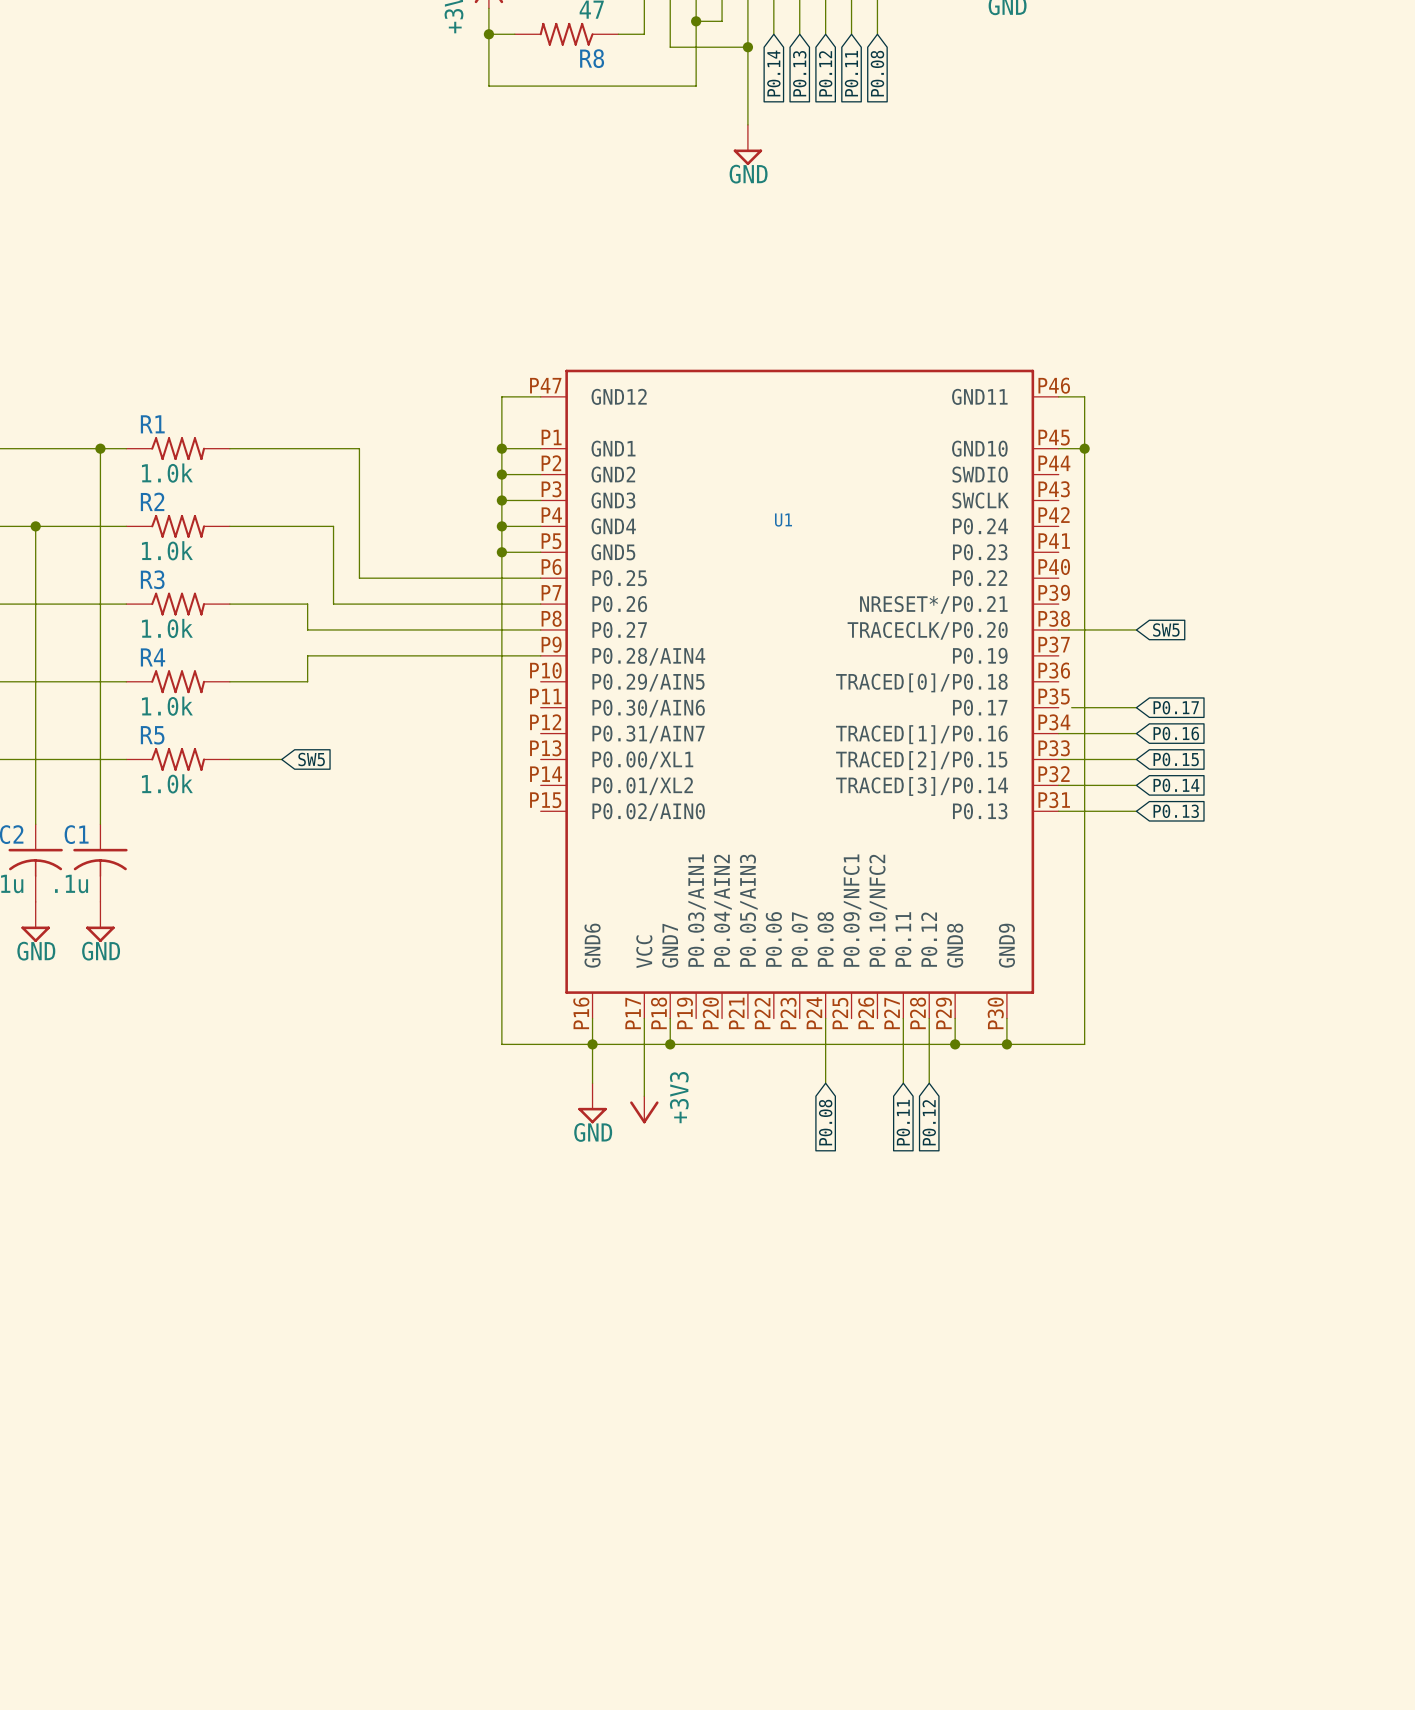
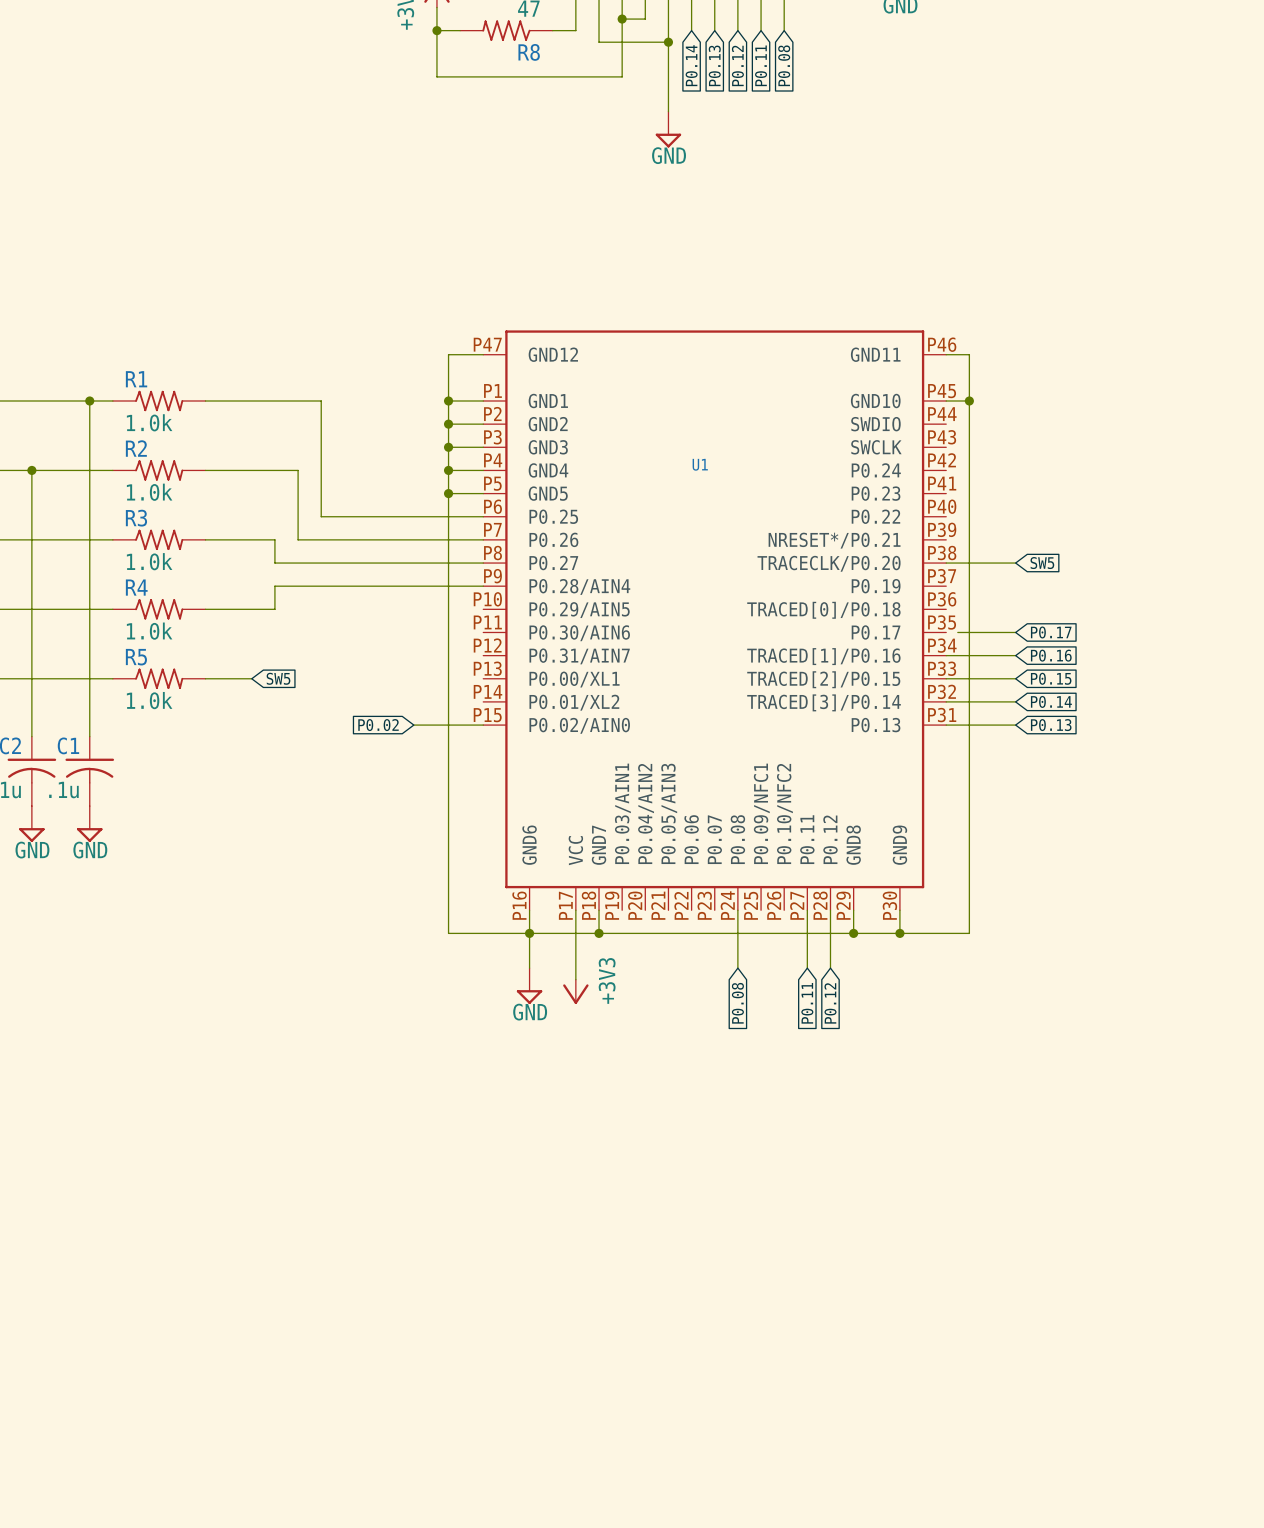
global label: none -> P0.02 (378, 725)
wire: none -> (413, 725) (483, 725)

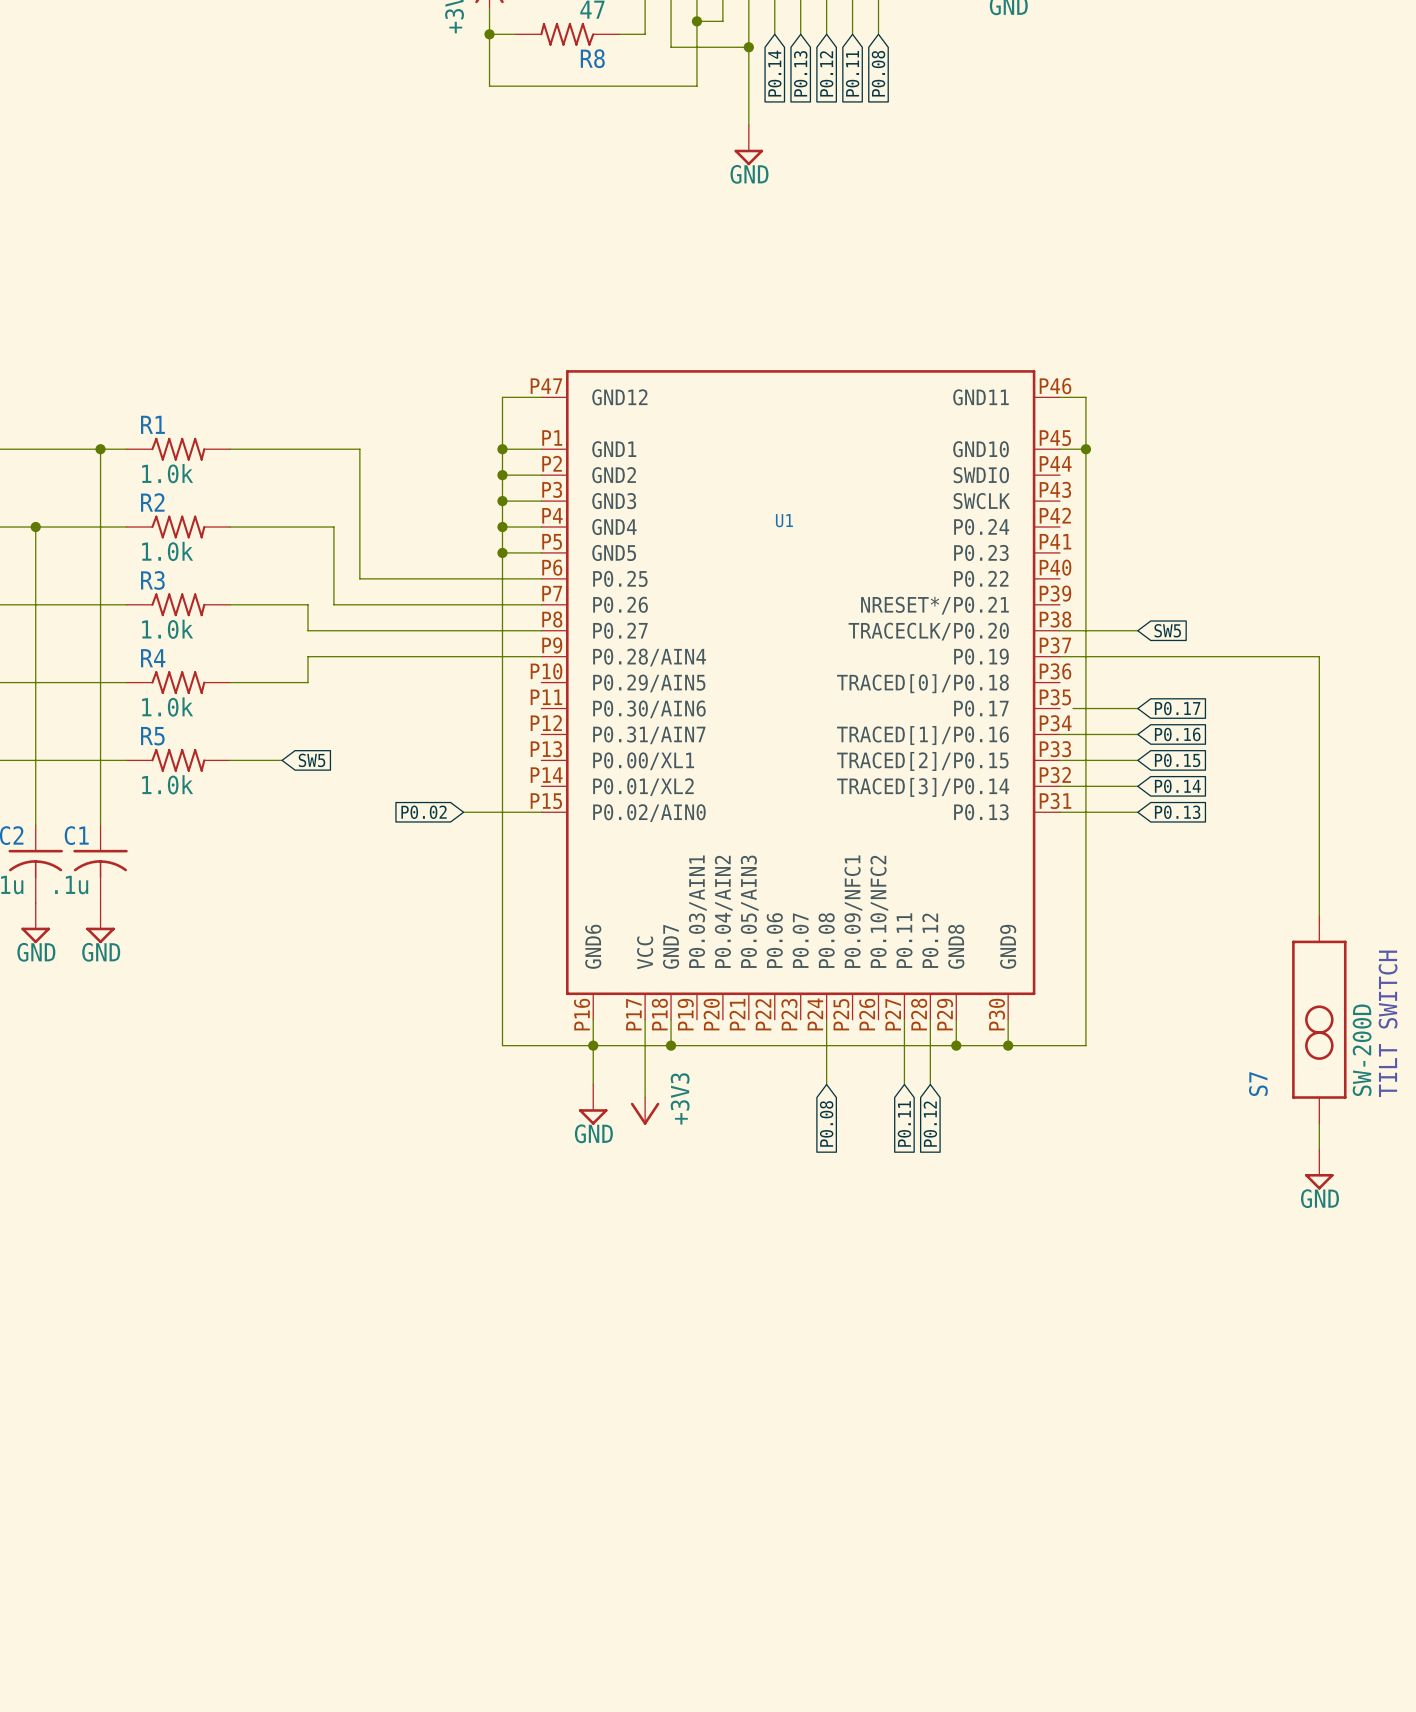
wire: none -> (1060, 656) (1319, 656) (1319, 915)
S7: none -> SW-200D (1319, 1019)
text: none -> TILT SWITCH (1388, 1023)
wire: none -> (1319, 1123) (1319, 1149)
power symbol: none -> GND (1319, 1169)

